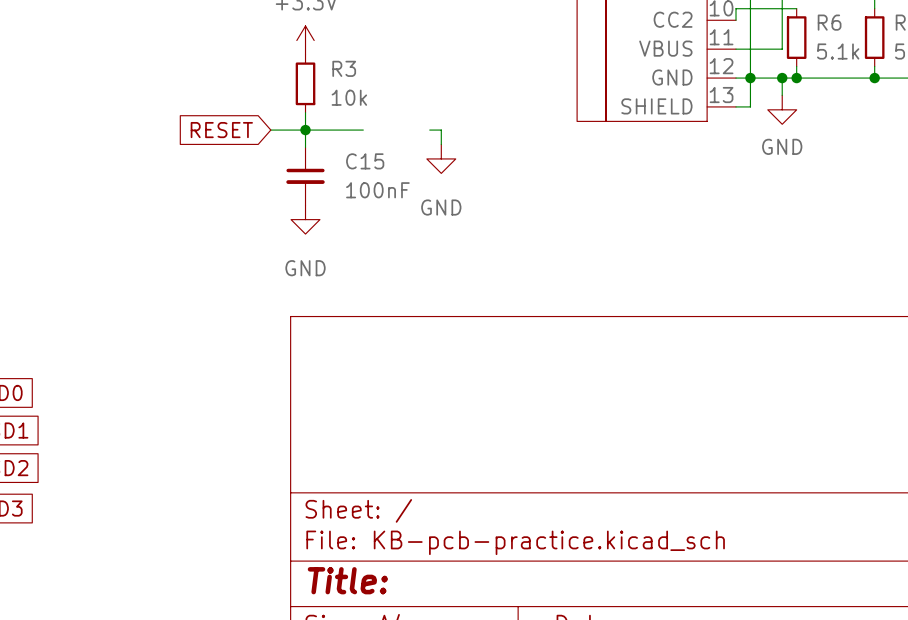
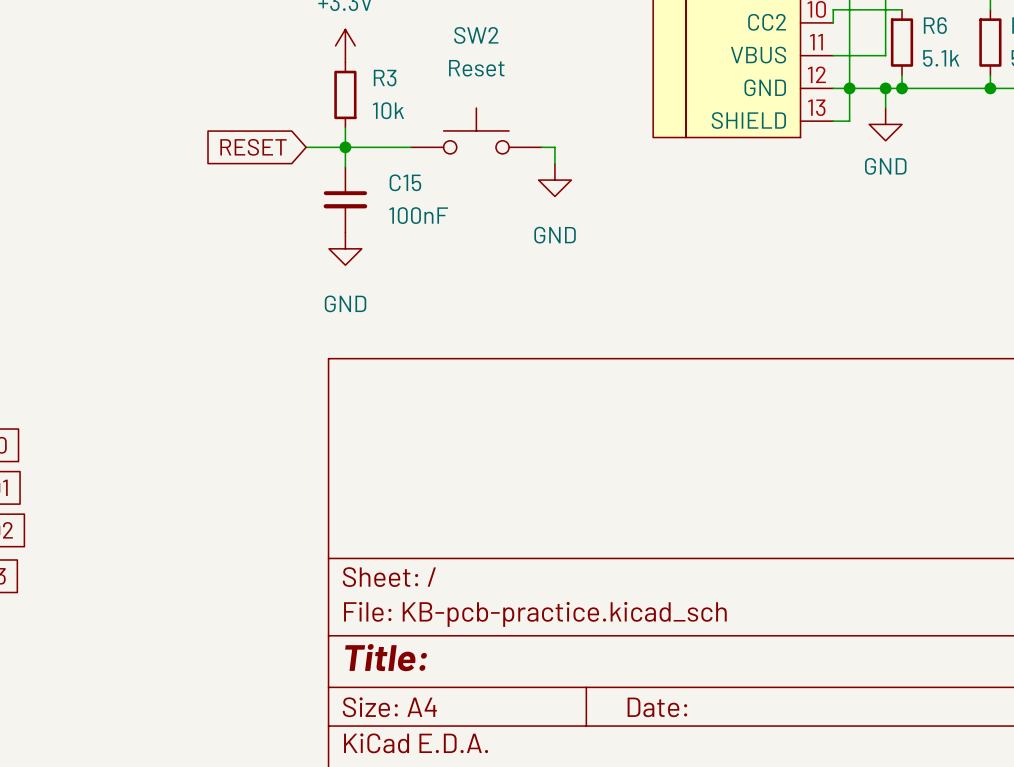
SW2: none -> Reset (476, 130)
wire: (429, 130) (441, 130) (441, 144) -> (541, 147) (554, 147) (554, 163)
power symbol position: GND (441, 158) -> GND (554, 180)

